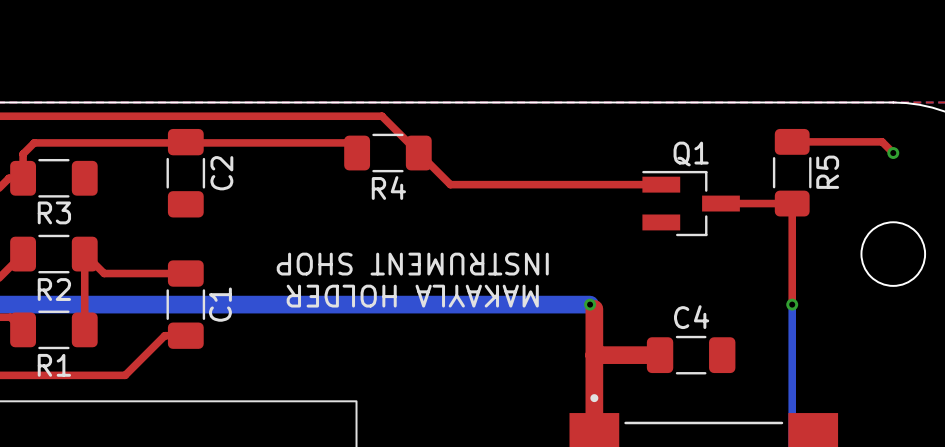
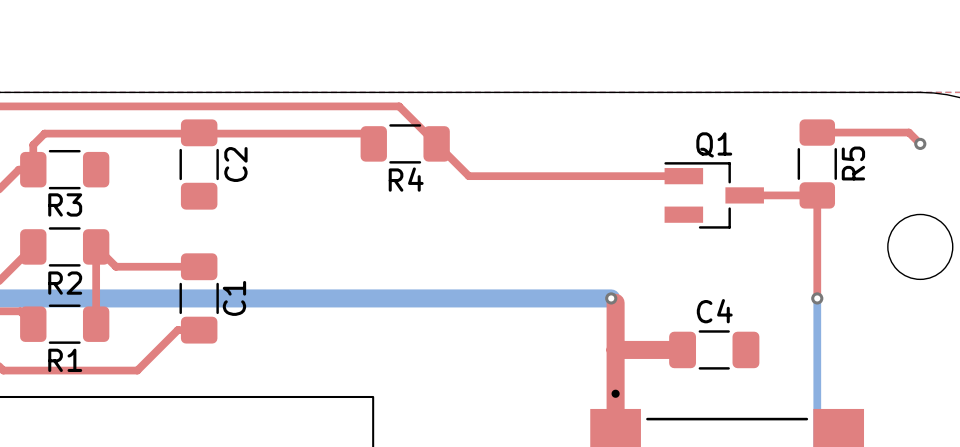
text: INSTRUMENT SHOP (412, 264) -> none
text: MAKAYLA HOLDER (412, 296) -> none

